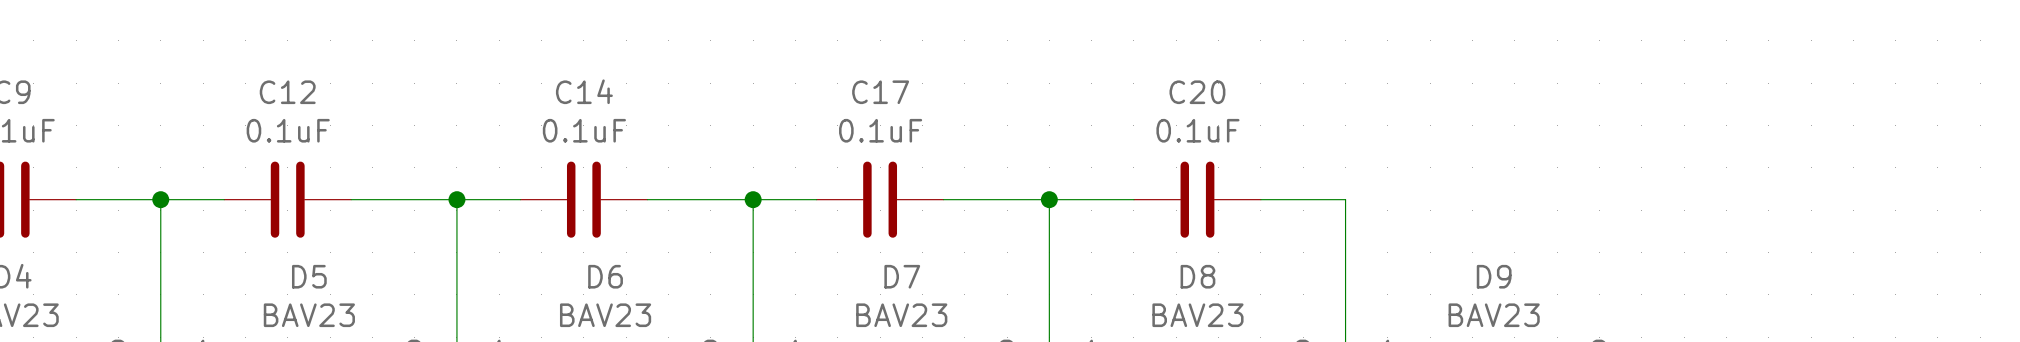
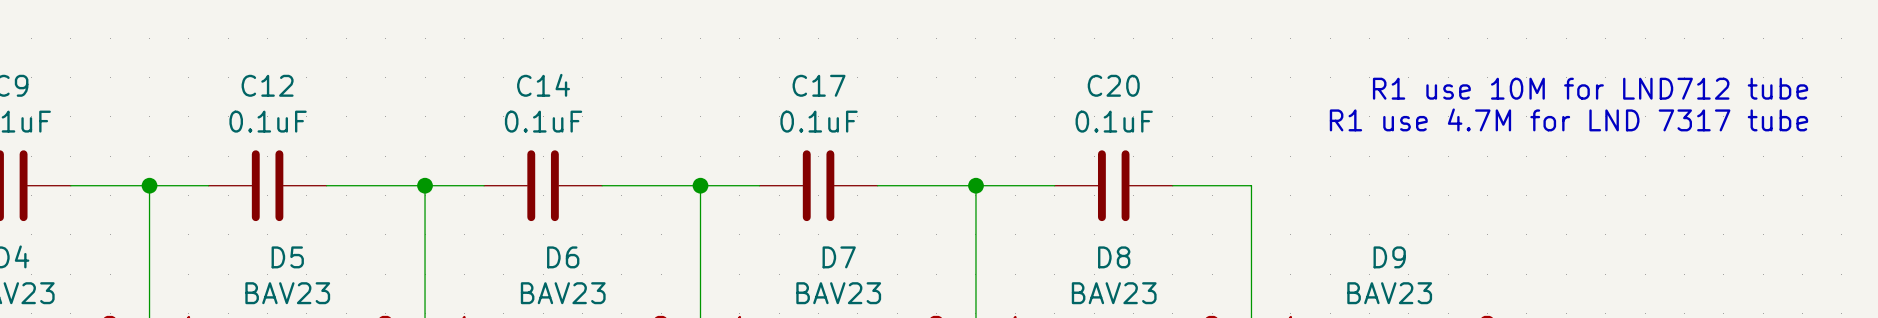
text: none -> R1 use 10M for LND712 tube (1590, 88)
text: none -> R1 use 4.7M for LND 7317 tube (1568, 119)

